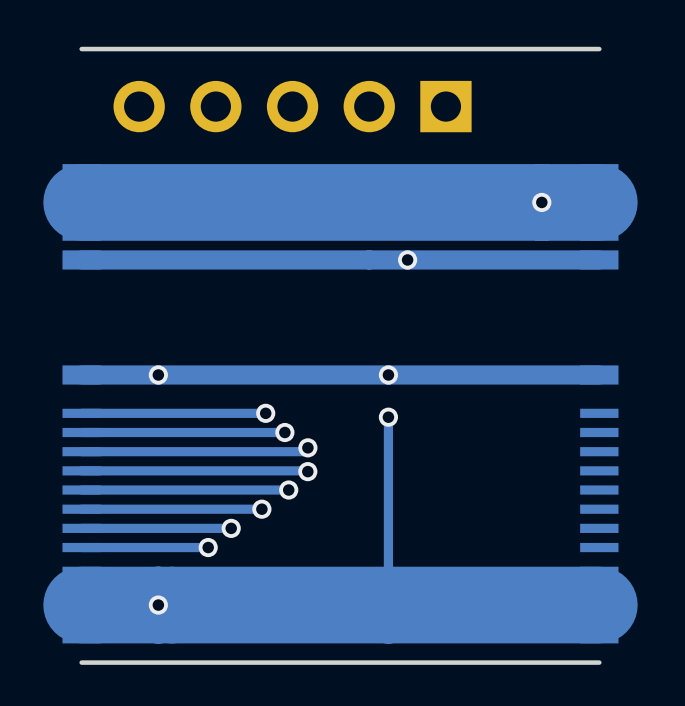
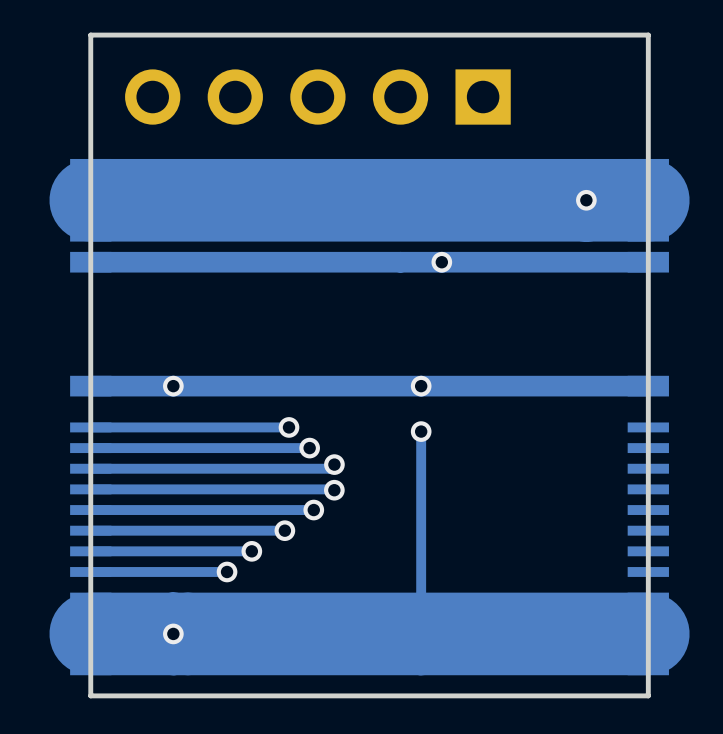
board edge: none -> (90, 35) (90, 695)
board edge: none -> (648, 35) (648, 695)

